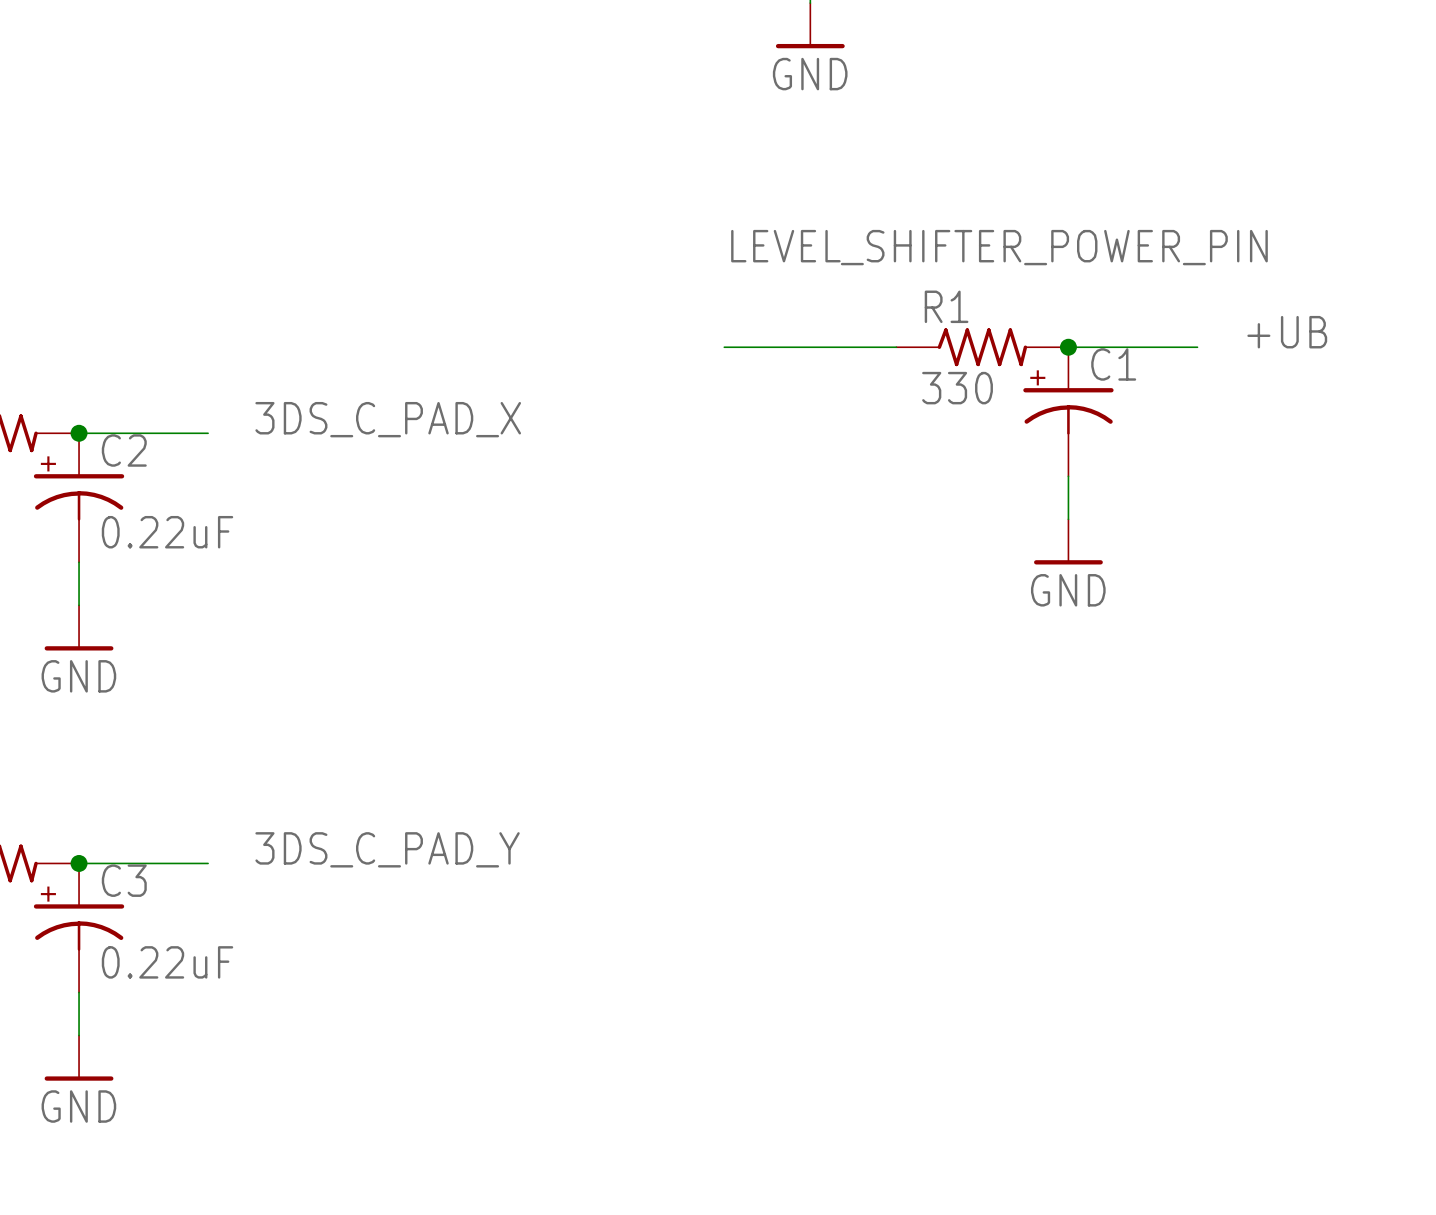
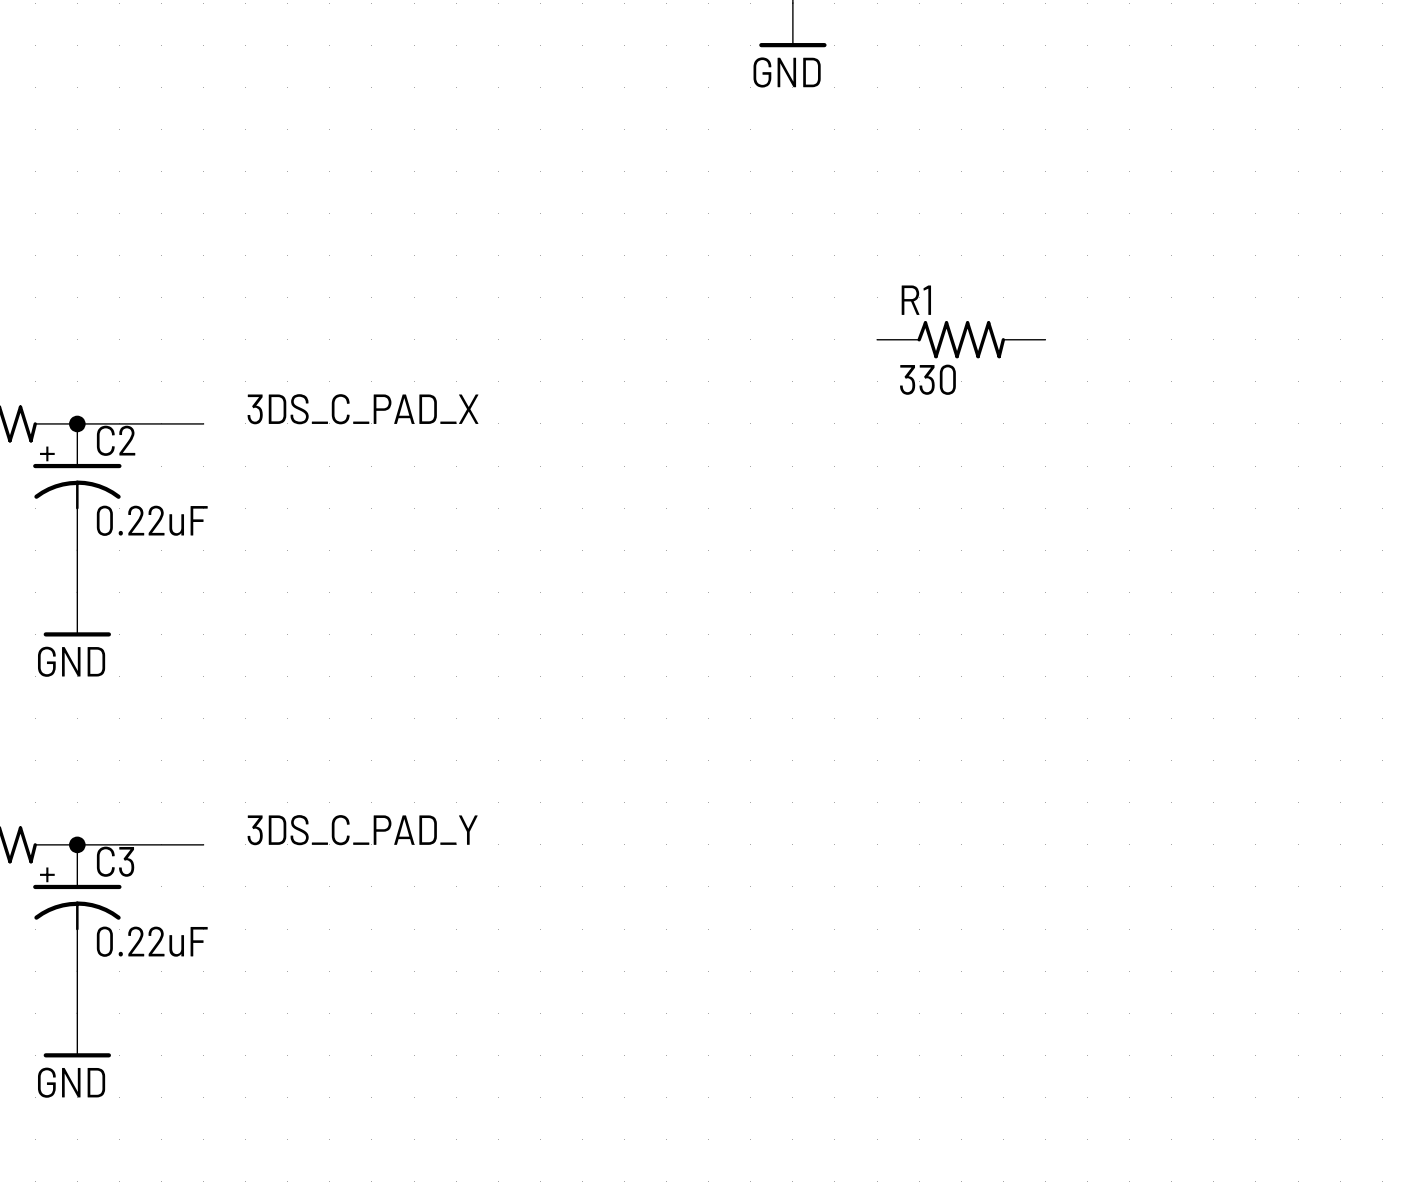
label: LEVEL_SHIFTER_POWER_PIN (999, 247) -> none
label: +UB (1287, 332) -> none
wire: (724, 347) (896, 347) -> none
wire: (1068, 347) (1197, 347) -> none
junction: (1068, 347) -> none
C1: (1068, 411) -> none
wire: (1068, 476) (1068, 519) -> none
power symbol: GND (1068, 541) -> none

